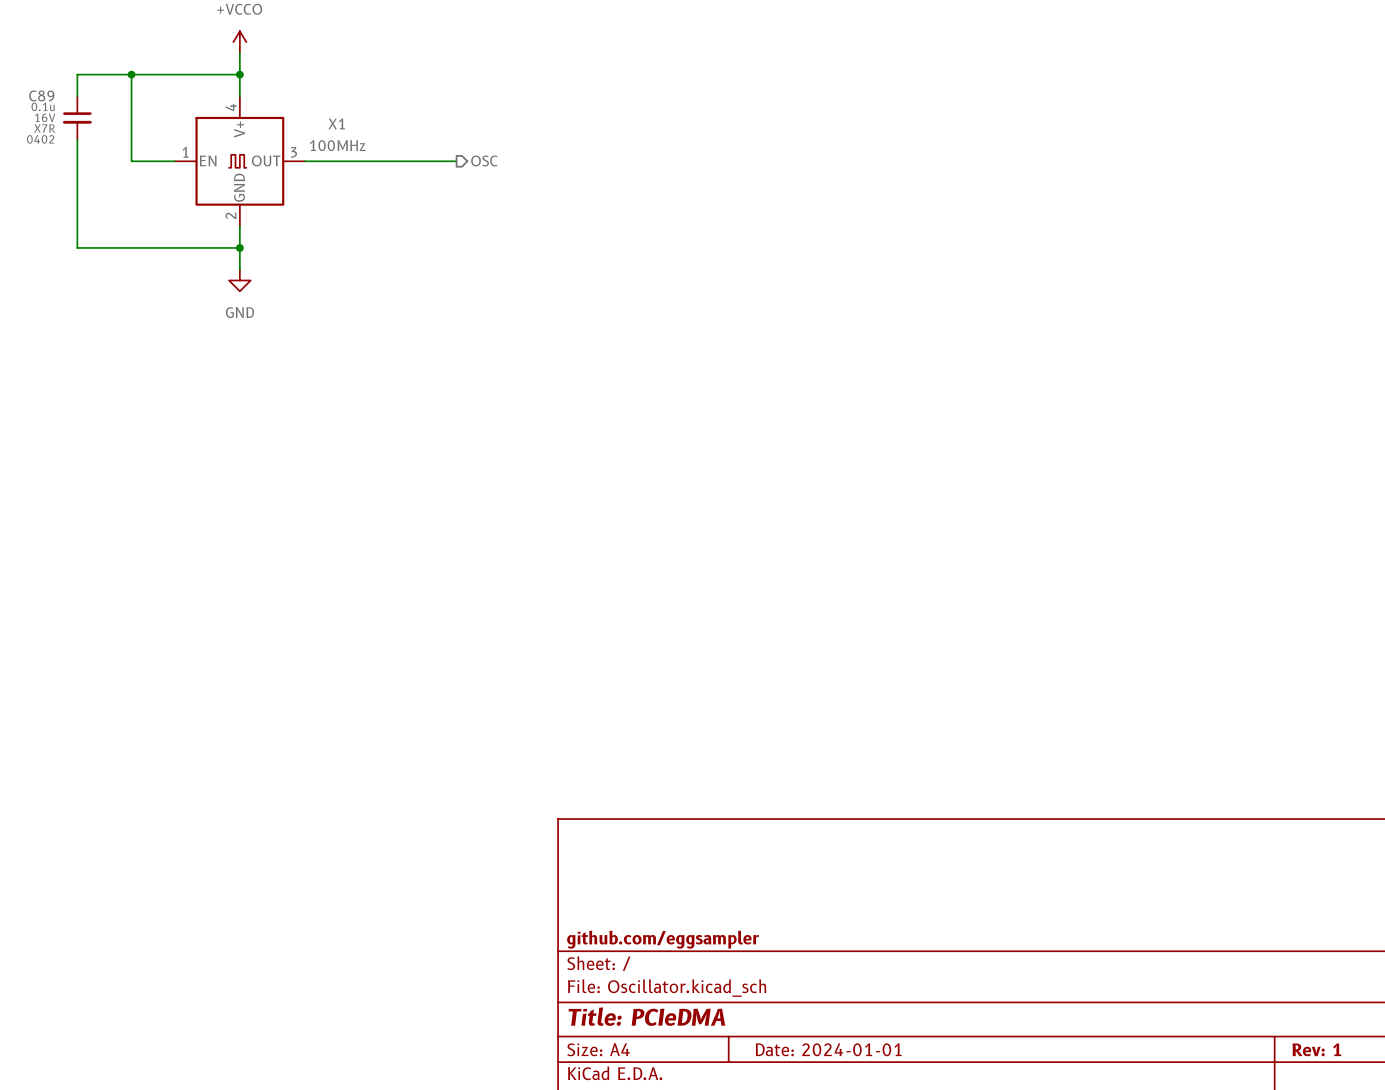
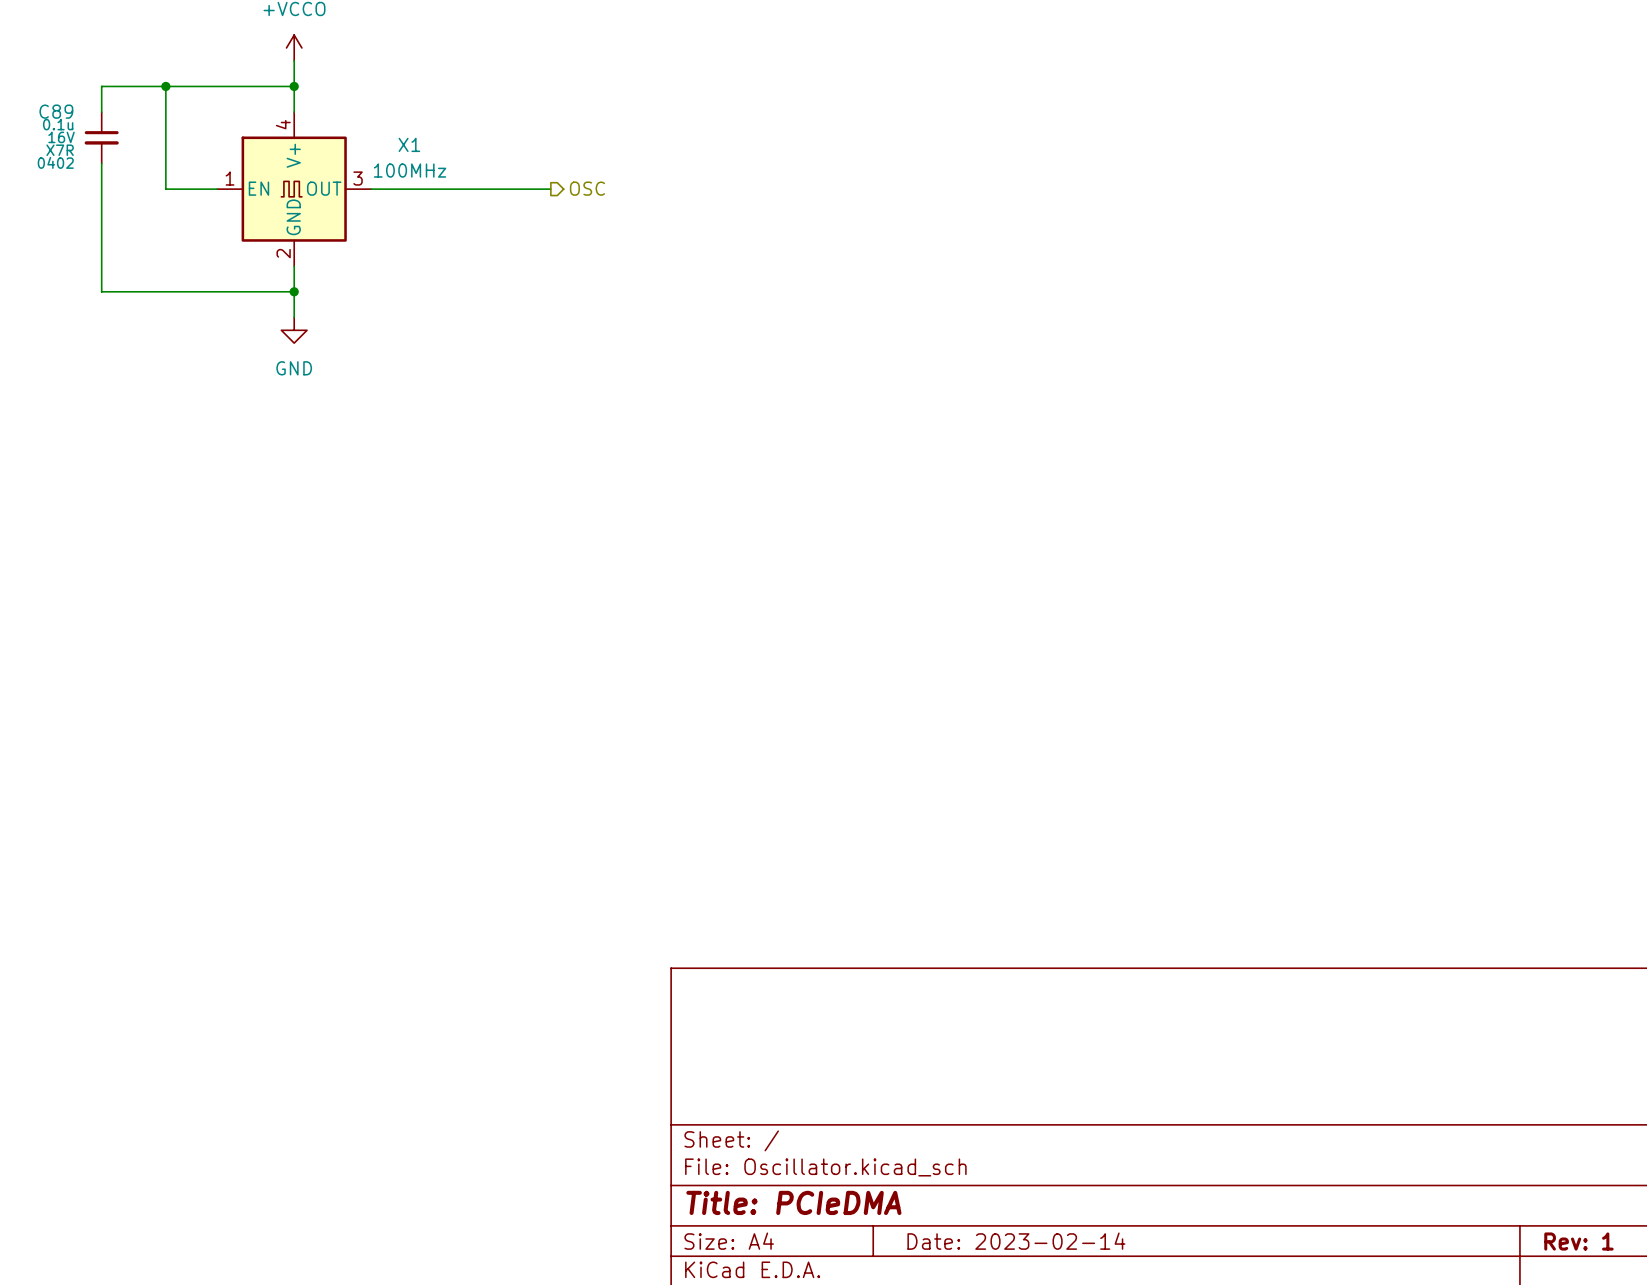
title block: github.com/eggsampler (663, 939) -> none
title block: Date: 2024-01-01 (828, 1049) -> Date: 2023-02-14 (1016, 1241)

